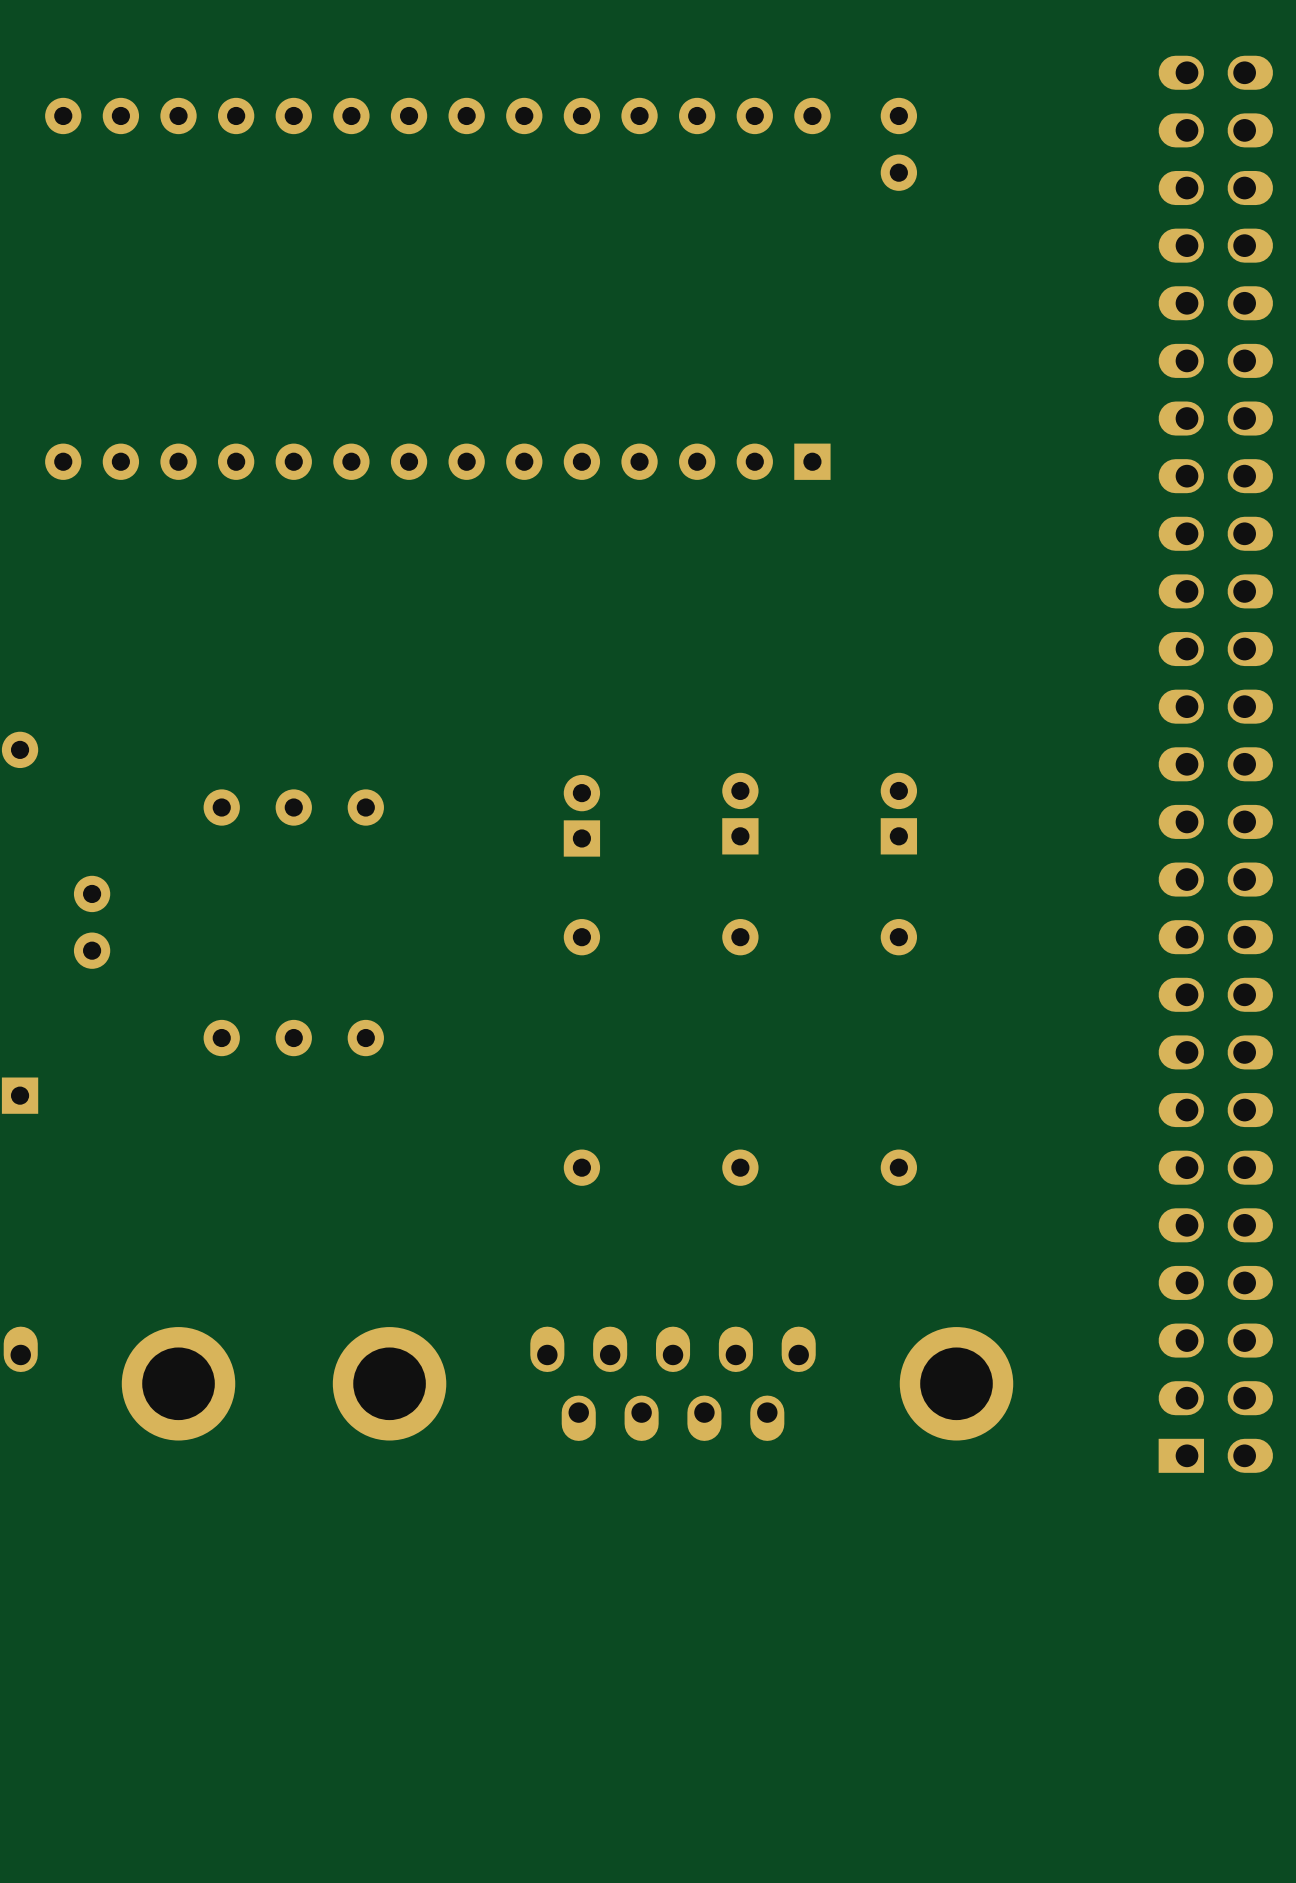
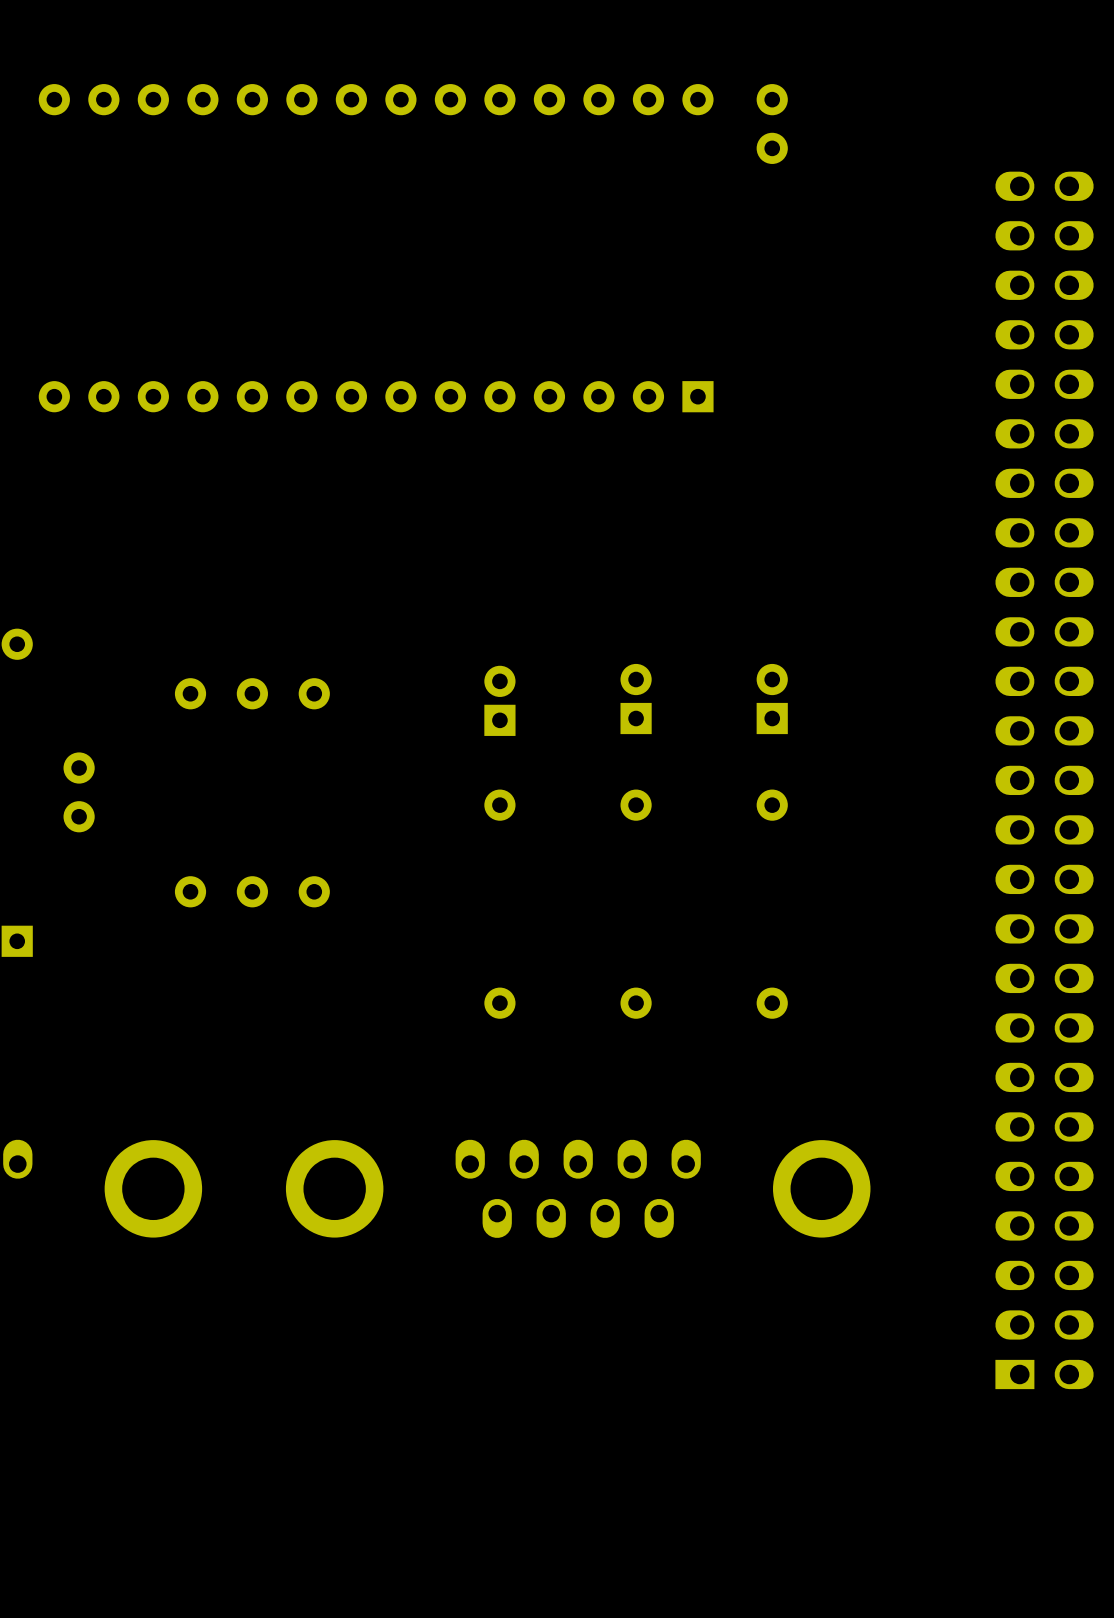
part position: (1215, 764) -> (1044, 780)

